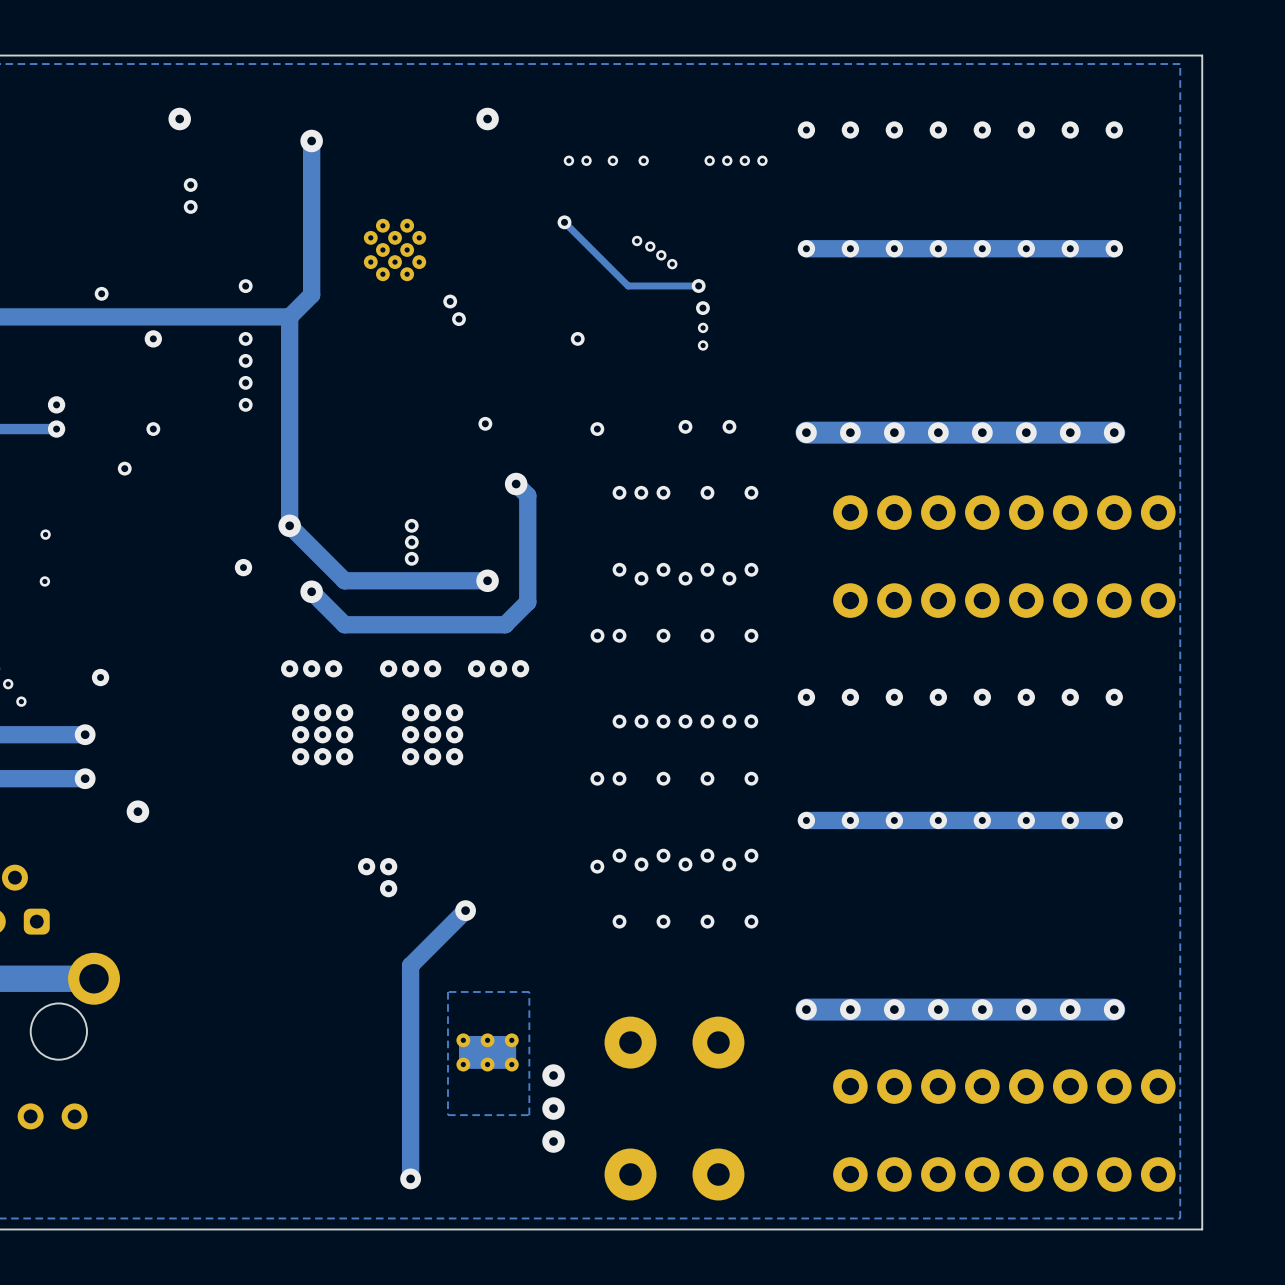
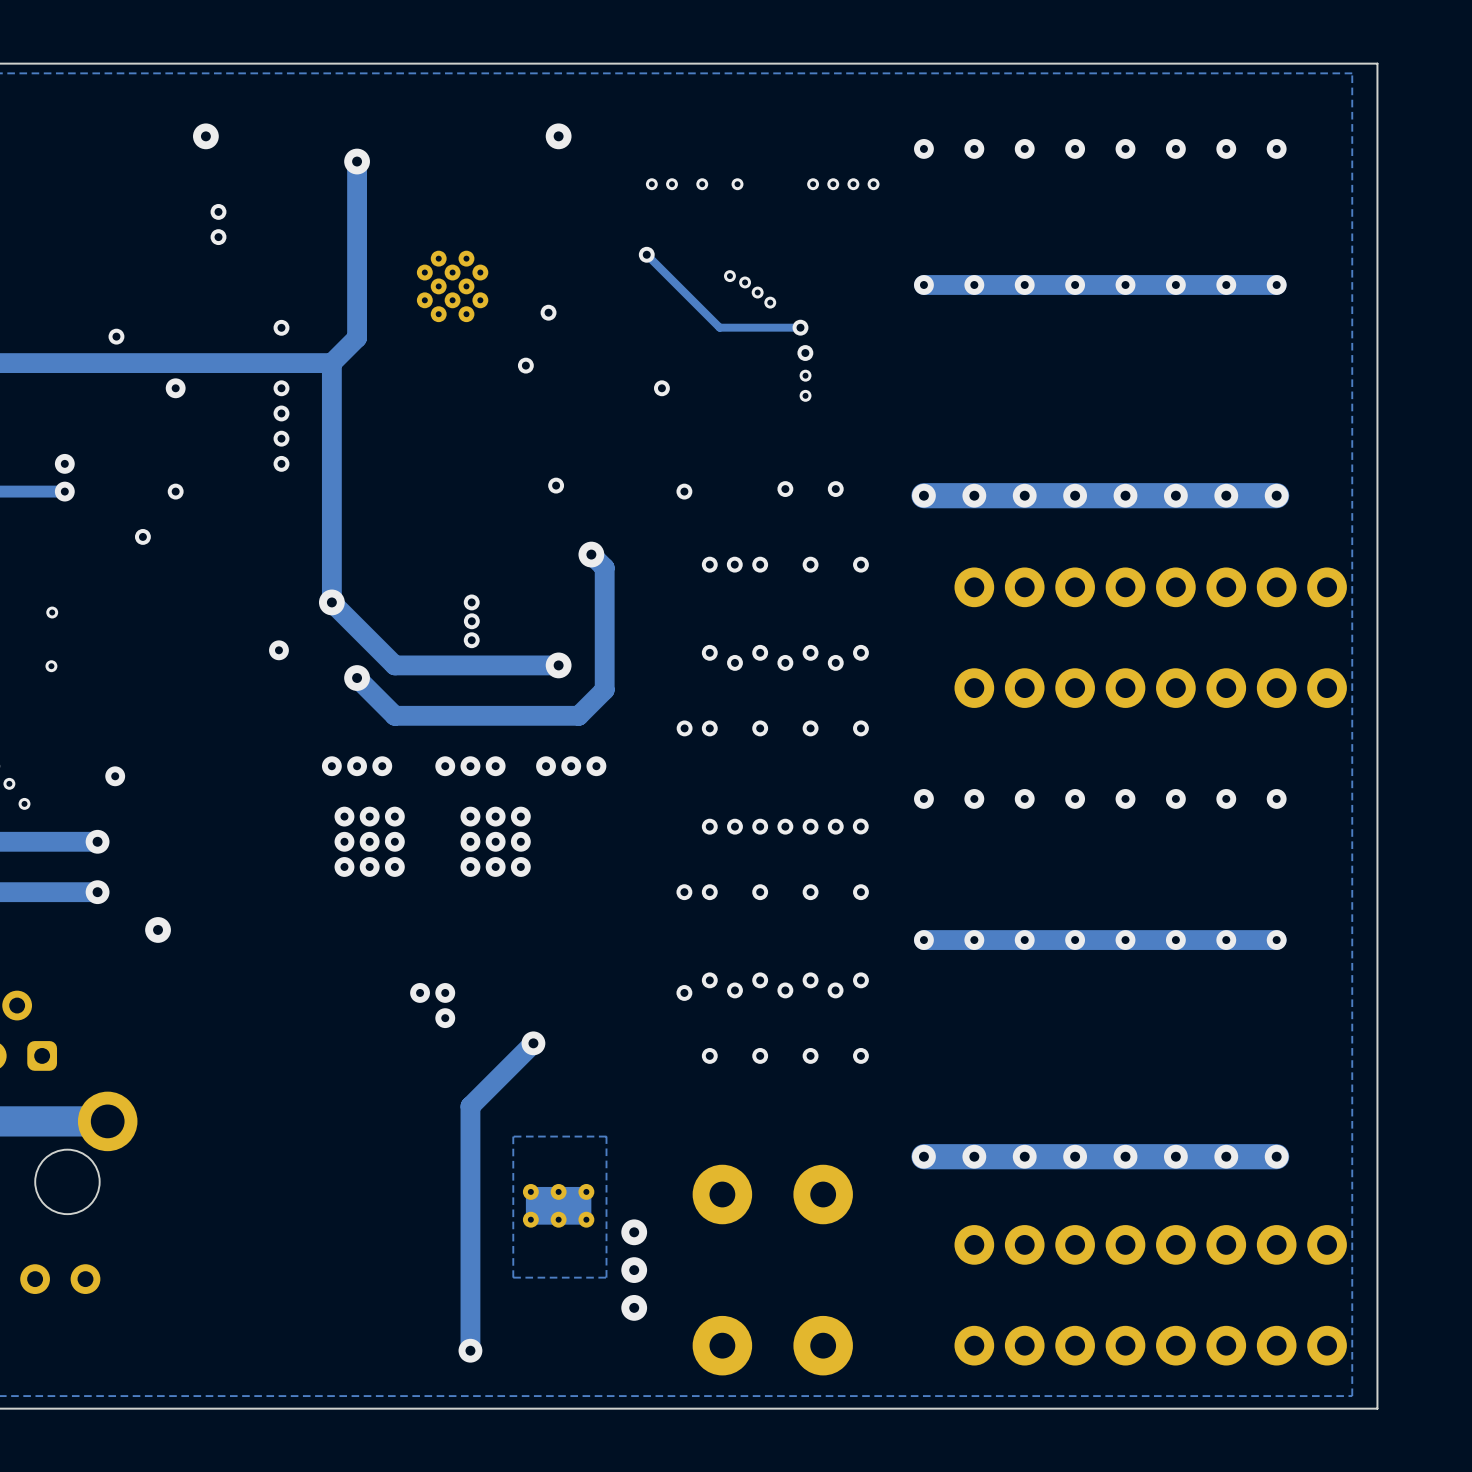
via position: (450, 301) -> (548, 312)

